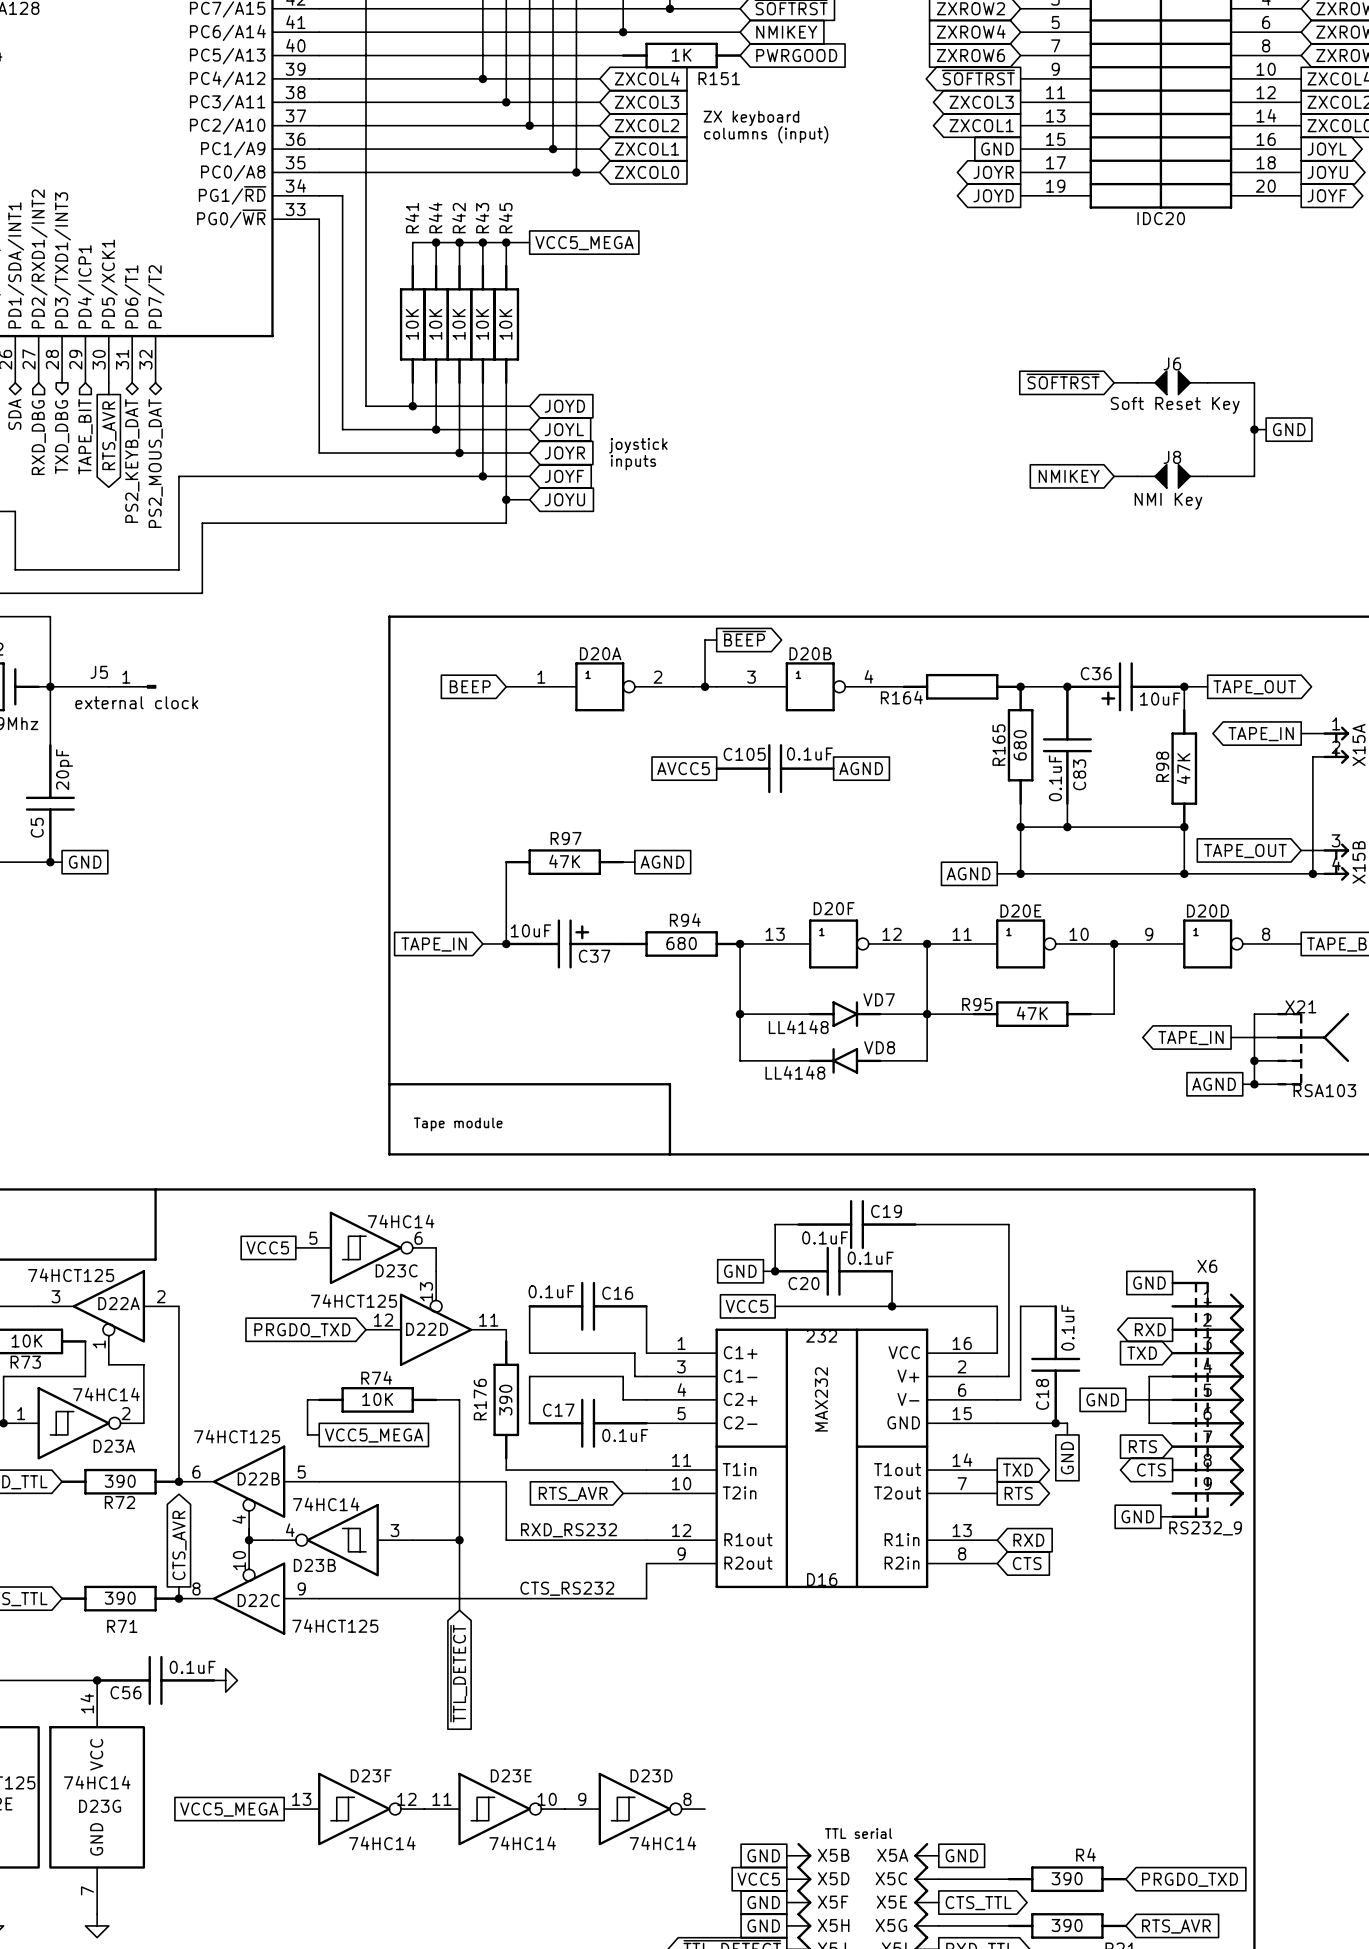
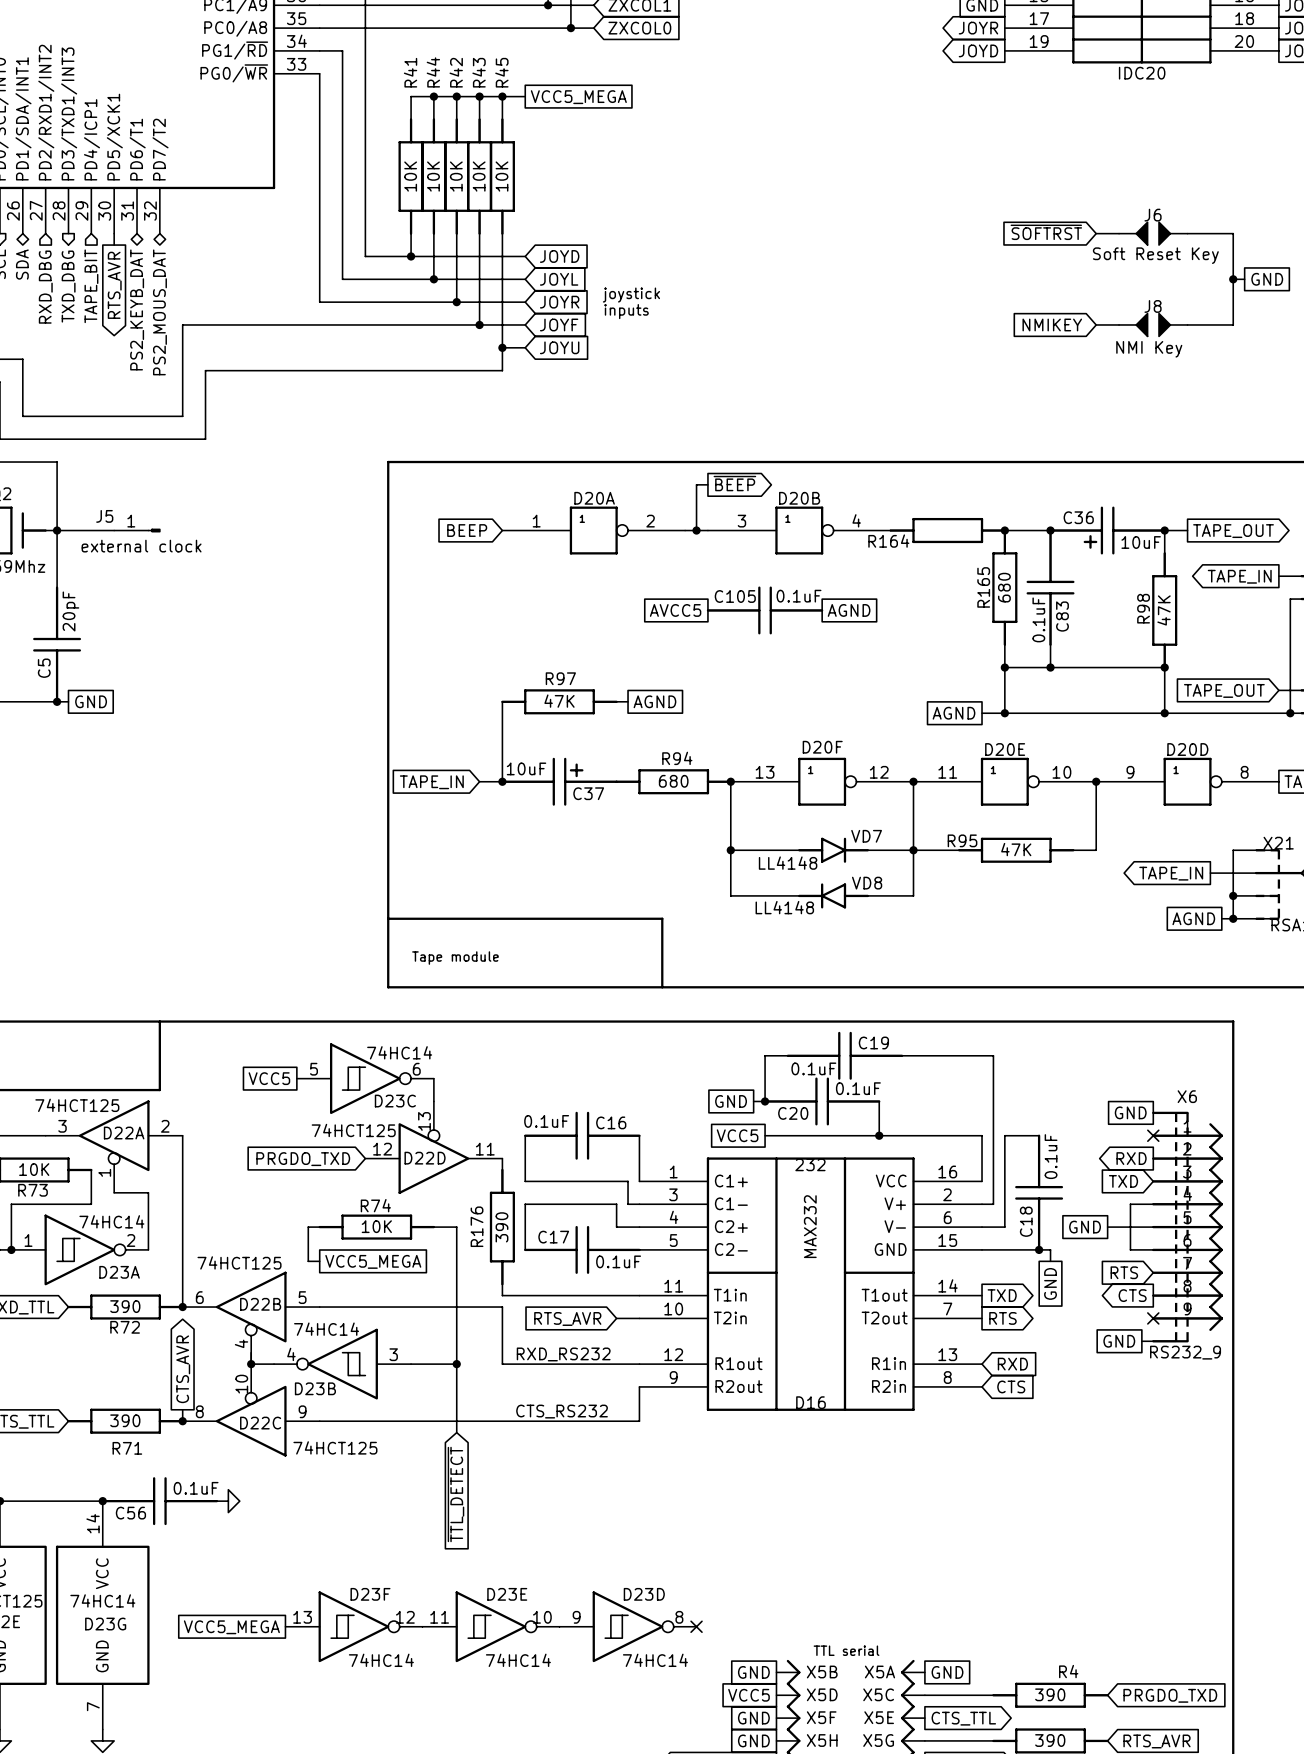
no-connect mark: none -> (1153, 1135)
no-connect mark: none -> (1153, 1318)
no-connect mark: none -> (696, 1626)

